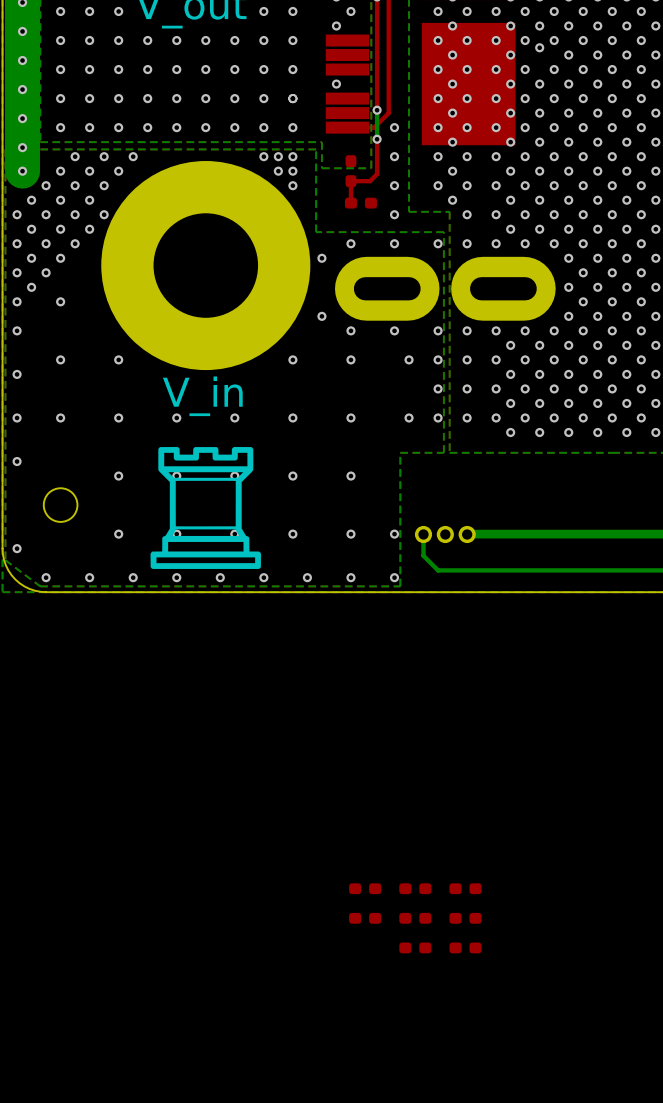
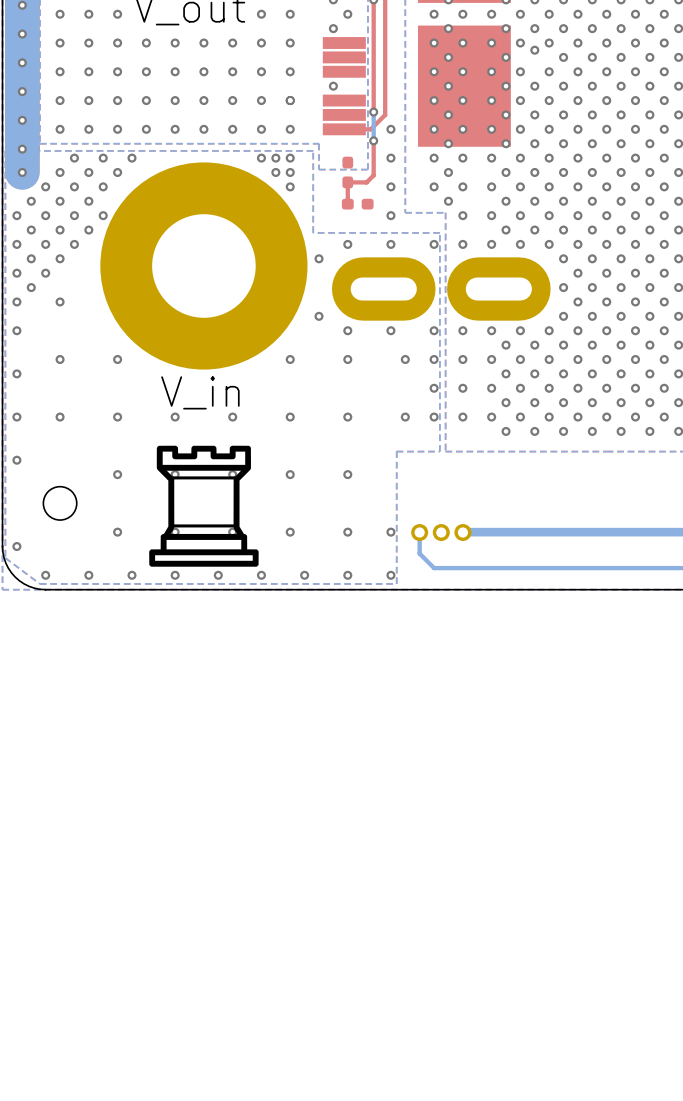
part: (365, 888) -> none
part: (415, 888) -> none
part: (465, 888) -> none
part: (365, 918) -> none
part: (415, 918) -> none
part: (465, 918) -> none
part: (415, 947) -> none
part: (465, 947) -> none

